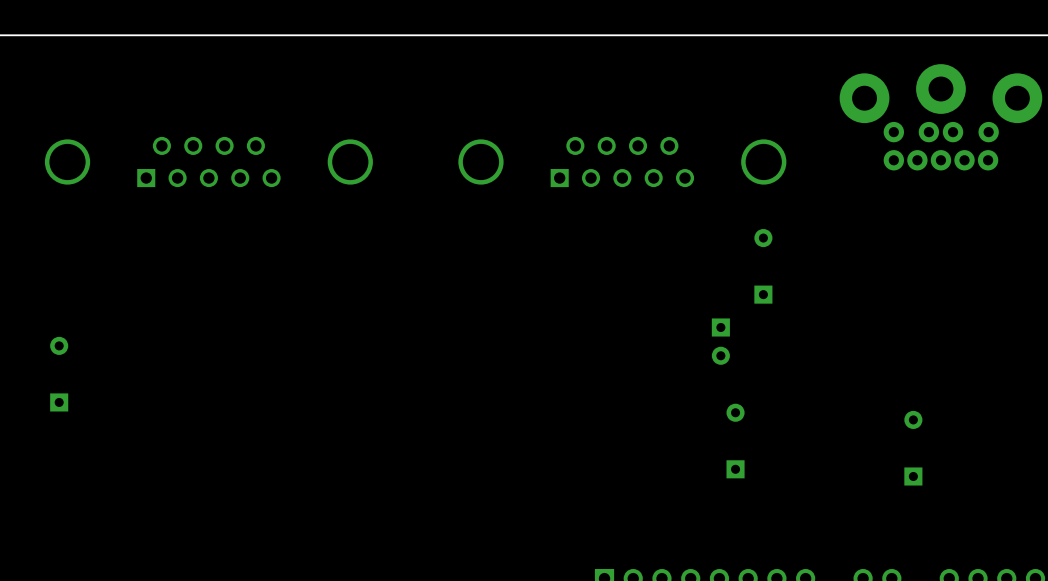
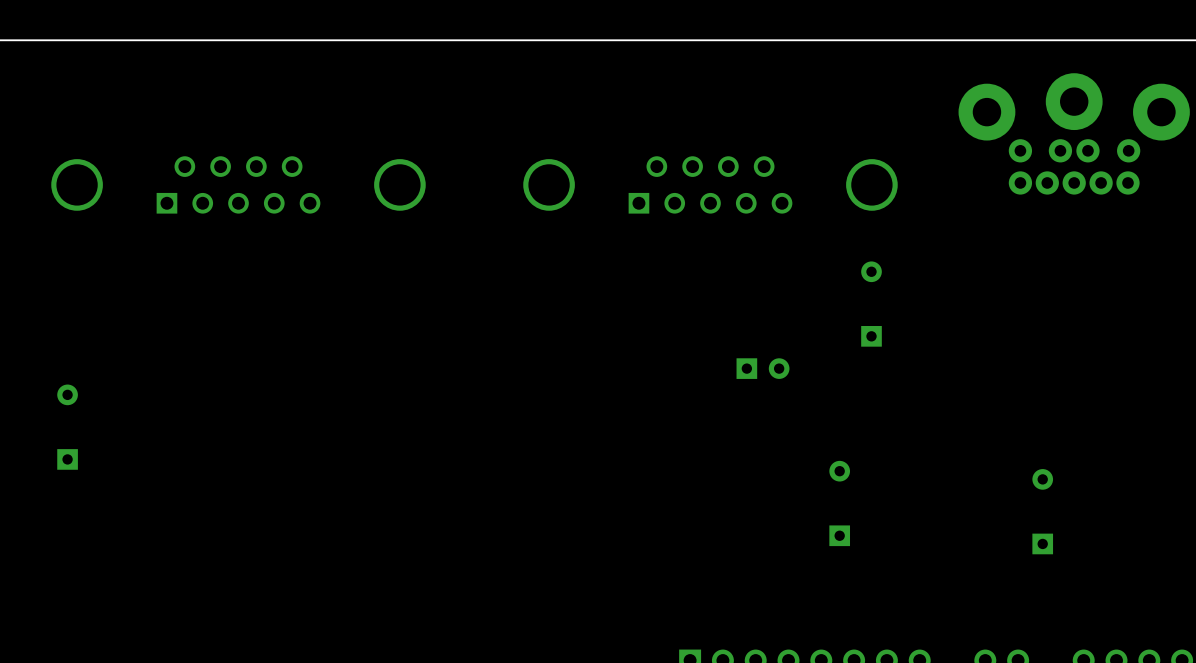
part rotation: 0° (720, 341) -> 90° counterclockwise (763, 368)
part position: (720, 341) -> (763, 368)

